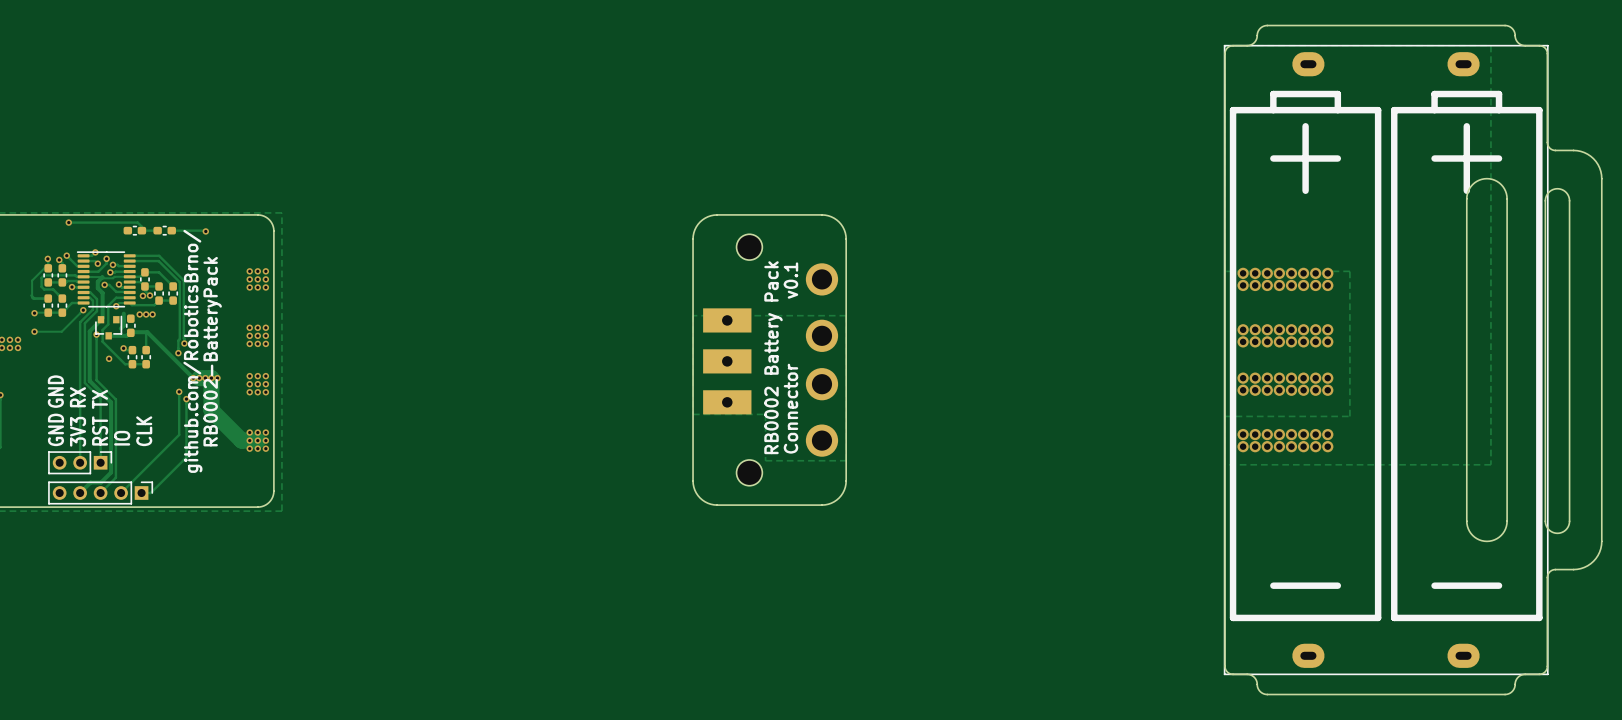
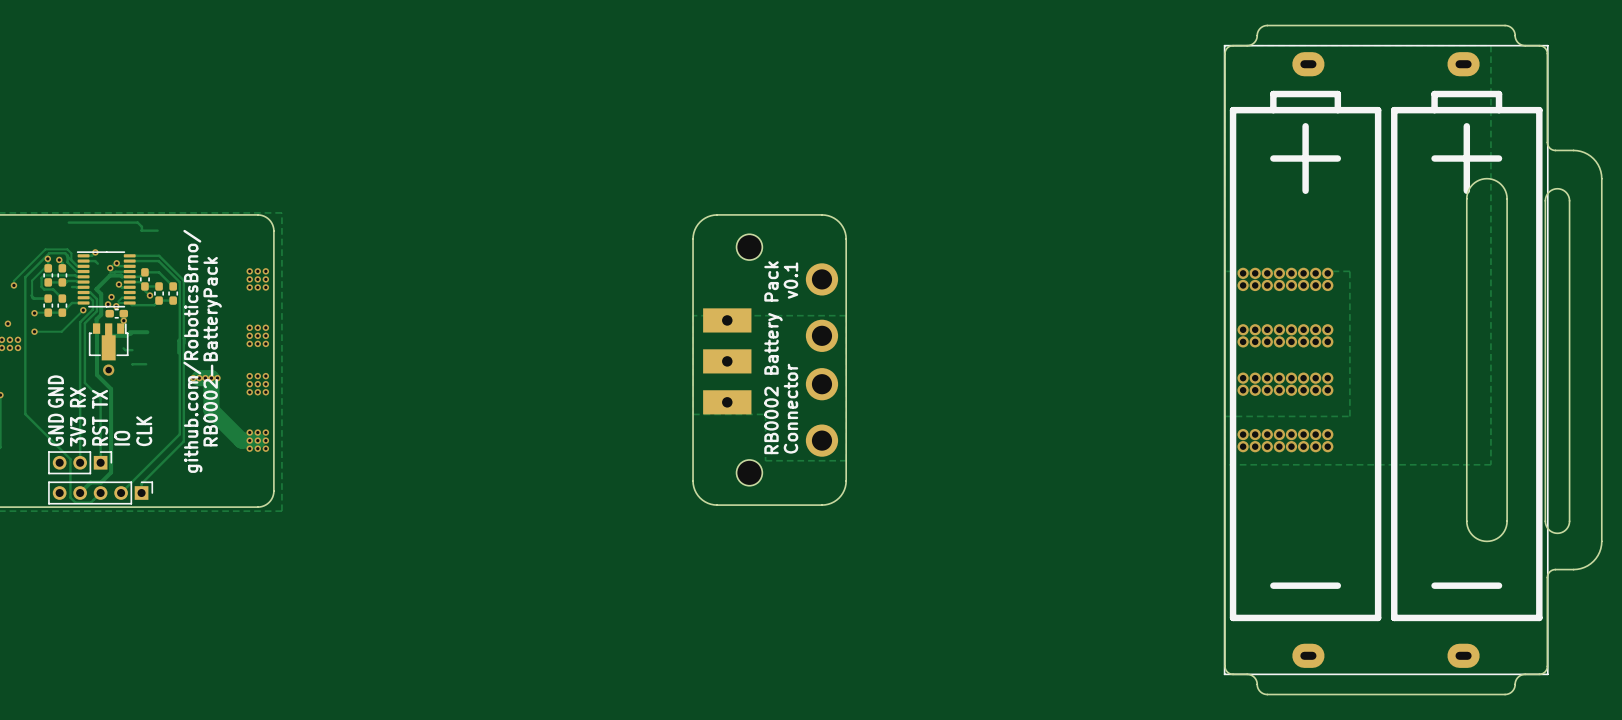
via: (68, 222) -> none
part: (134, 230) -> none
part: (164, 230) -> none
track: (171, 230) (205, 231) -> none
via: (205, 231) -> none
via: (66, 255) -> none
track: (106, 258) (106, 263) (98, 271) (82, 271) -> none
via: (106, 258) -> none
via: (97, 263) -> none
via: none -> (116, 263)
via: (112, 264) -> none
track: none -> (83, 266) (77, 266) (71, 260) (71, 253) (67, 249) (45, 249) (13, 280) (13, 285)
via: none -> (110, 268)
via: (110, 272) -> none
track: (122, 276) (113, 278) (83, 276) -> none
track: (102, 277) (97, 281) (97, 288) (102, 292) (102, 318) (89, 331) (89, 380) (111, 402) -> (122, 276) (110, 275) (96, 289) (101, 294) (101, 314) (96, 319) (96, 374) (111, 389) (111, 402)
track: (104, 284) (109, 284) (116, 291) (130, 291) -> none
via: (104, 284) -> none
via: none -> (13, 285)
via: (72, 287) -> none
via: (142, 295) -> none
via: none -> (111, 297)
track: (122, 297) (116, 297) (108, 305) (108, 324) (102, 330) (102, 341) (125, 364) (132, 364) -> (122, 297) (118, 301)
via: none -> (108, 304)
via: (139, 314) -> none
via: (146, 314) -> none
via: (152, 314) -> none
via: none -> (123, 320)
via: none -> (7, 323)
part rotation: 0° (130, 325) -> 90° clockwise (116, 313)
part position: (130, 325) -> (116, 313)
part: (108, 327) -> none
track: (96, 334) (96, 380) (115, 399) (115, 477) (100, 493) -> (83, 271) (76, 271) (67, 262) (67, 255) (65, 253) (49, 253) (25, 277) (25, 414) (70, 459) (70, 497) (75, 502) (90, 502) (100, 493)
via: (96, 334) -> none
part: none -> (108, 341)
via: (184, 343) -> none
via: (123, 348) -> none
track: (146, 350) (147, 332) (193, 378) -> none
via: (178, 353) -> none
part: (132, 357) -> none
part: (146, 357) -> none
via: (109, 358) -> none
via: none -> (108, 370)
track: (179, 391) (179, 434) -> (179, 339) (179, 434)
via: (179, 391) -> none
track: (186, 399) (186, 457) (150, 493) (141, 493) -> (183, 338) (183, 441) (141, 483) (141, 493)
via: (186, 399) -> none

